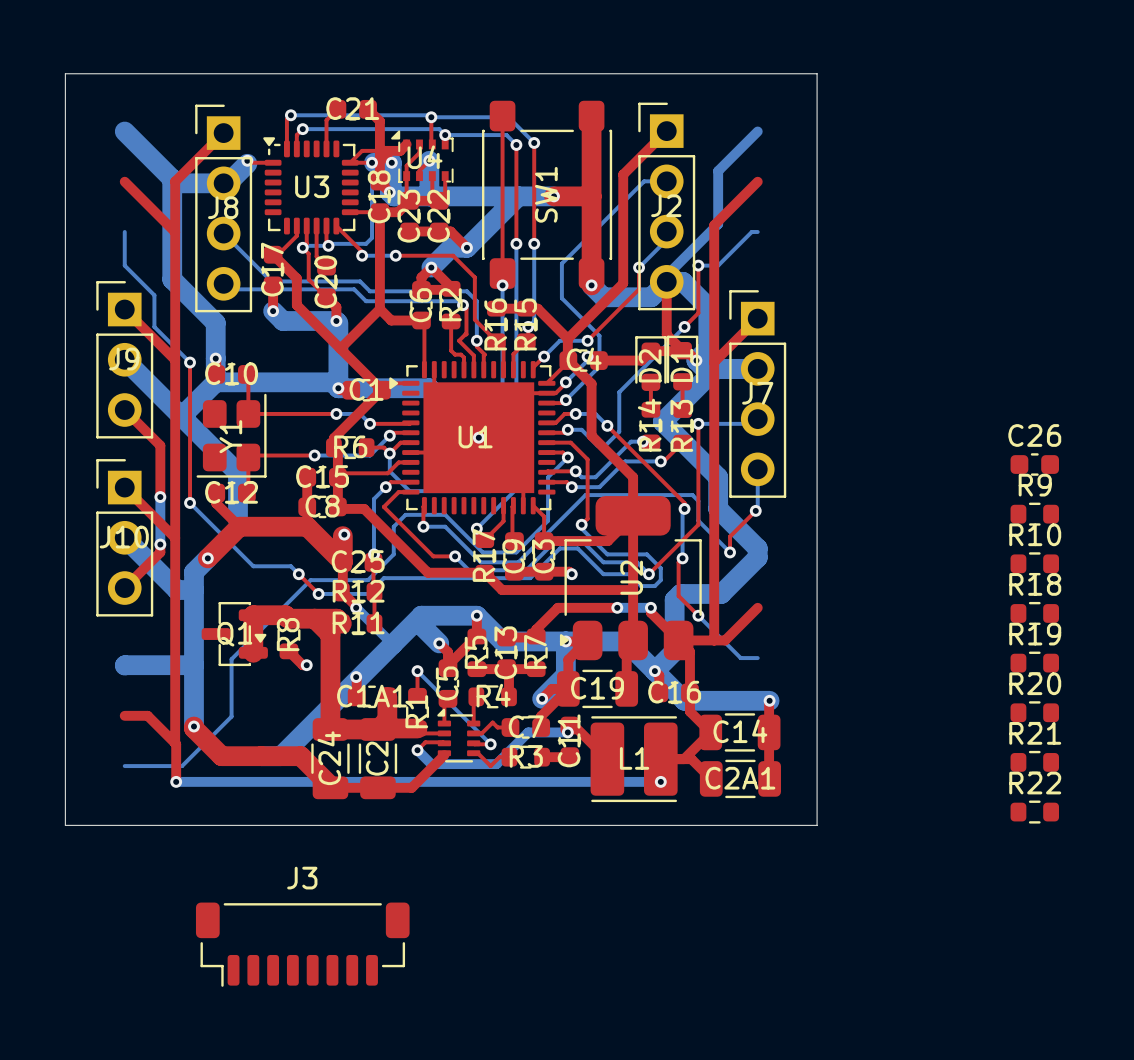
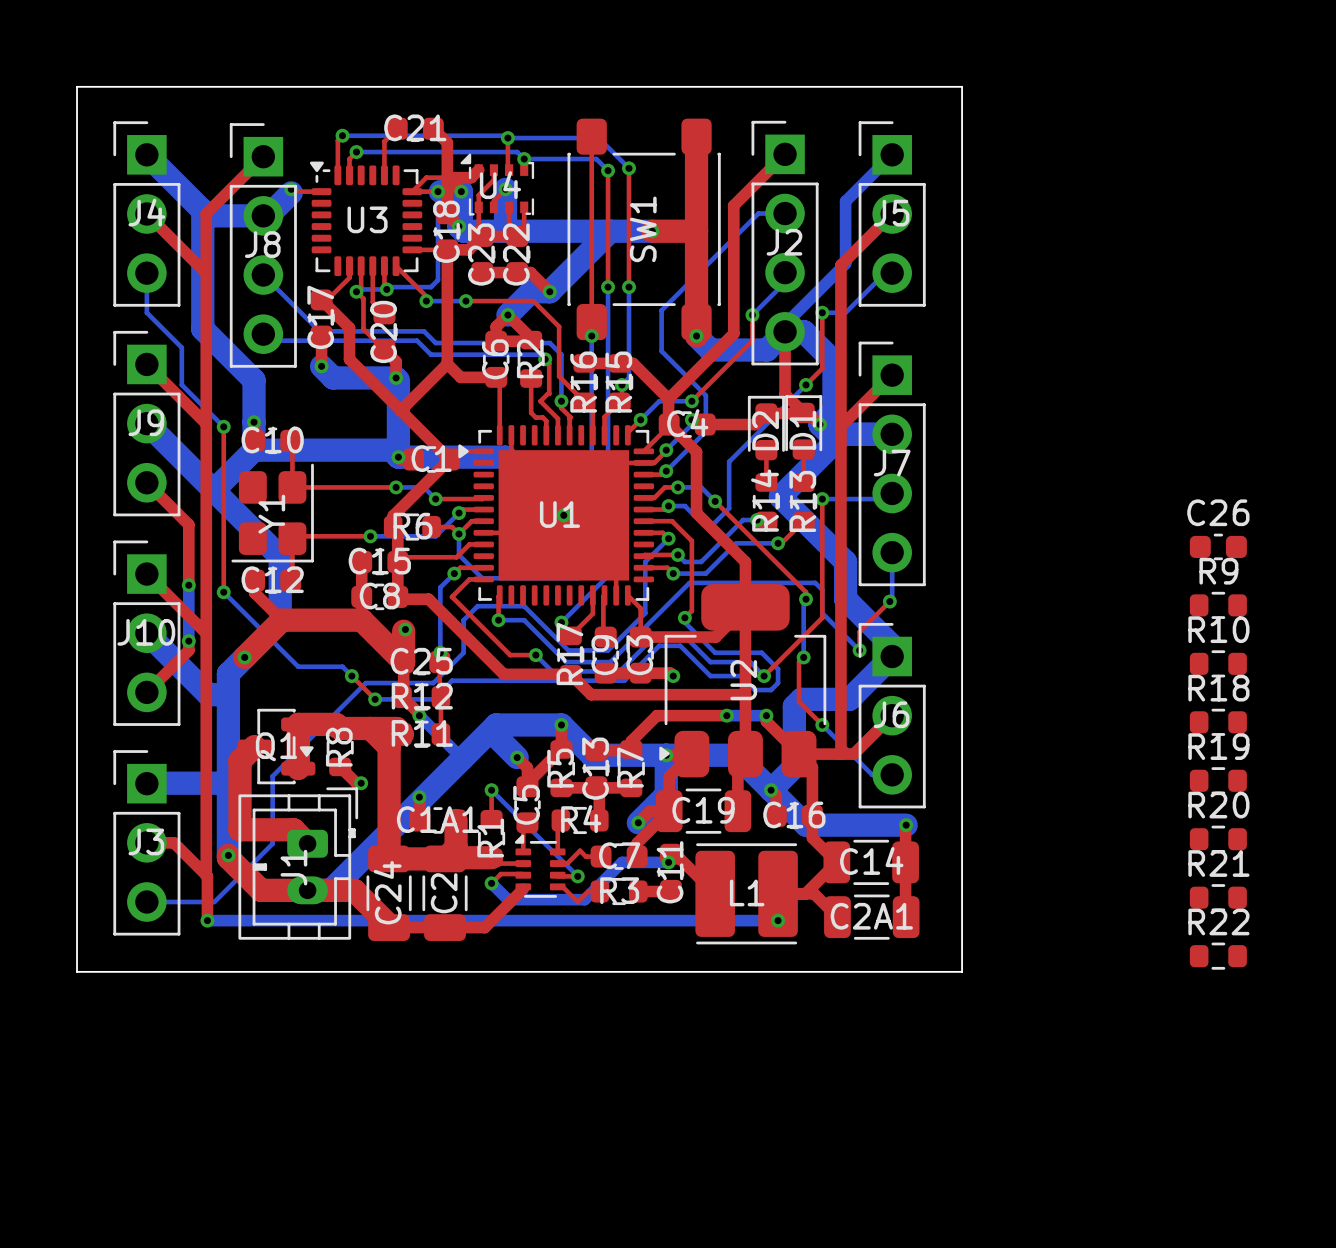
J4: none -> (146, 213)
J5: none -> (892, 213)
J6: none -> (892, 715)
top track: none -> (254, 746) (240, 761) (240, 829) (293, 829) (307, 843)
J1: none -> (298, 863)
J3 name position: J3 (302, 878) -> J3 (146, 841)
J3 footprint: [195, 902, 410, 987] -> [113, 750, 181, 936]

